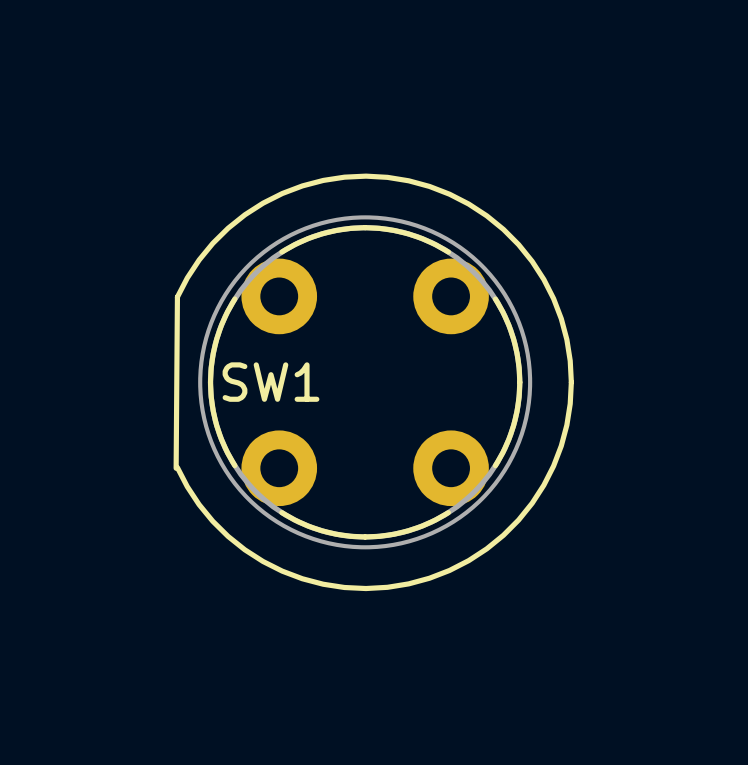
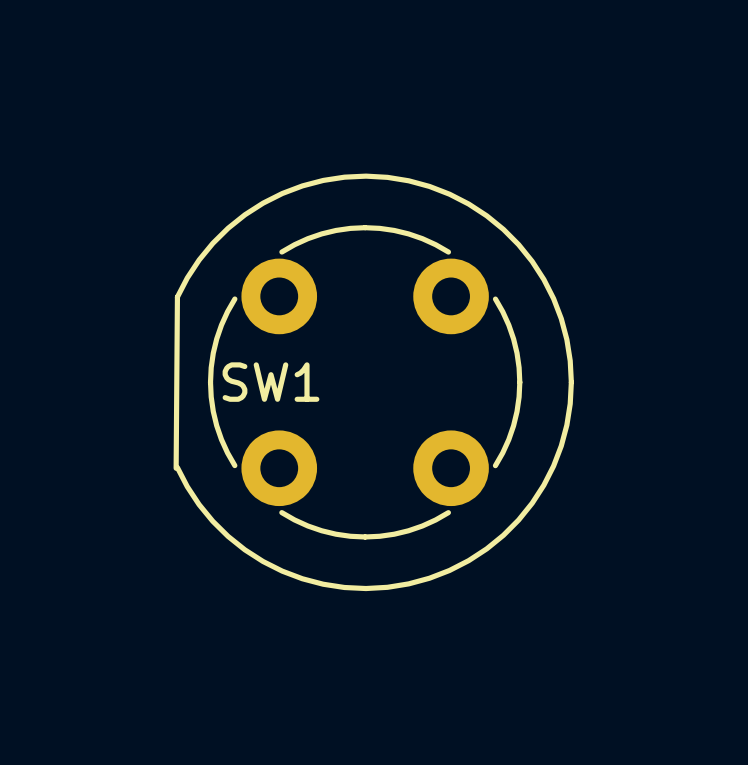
SW1 footprint: [173, 173, 574, 592] -> [173, 173, 574, 592]
drawing: [198, 215, 533, 550] -> none

